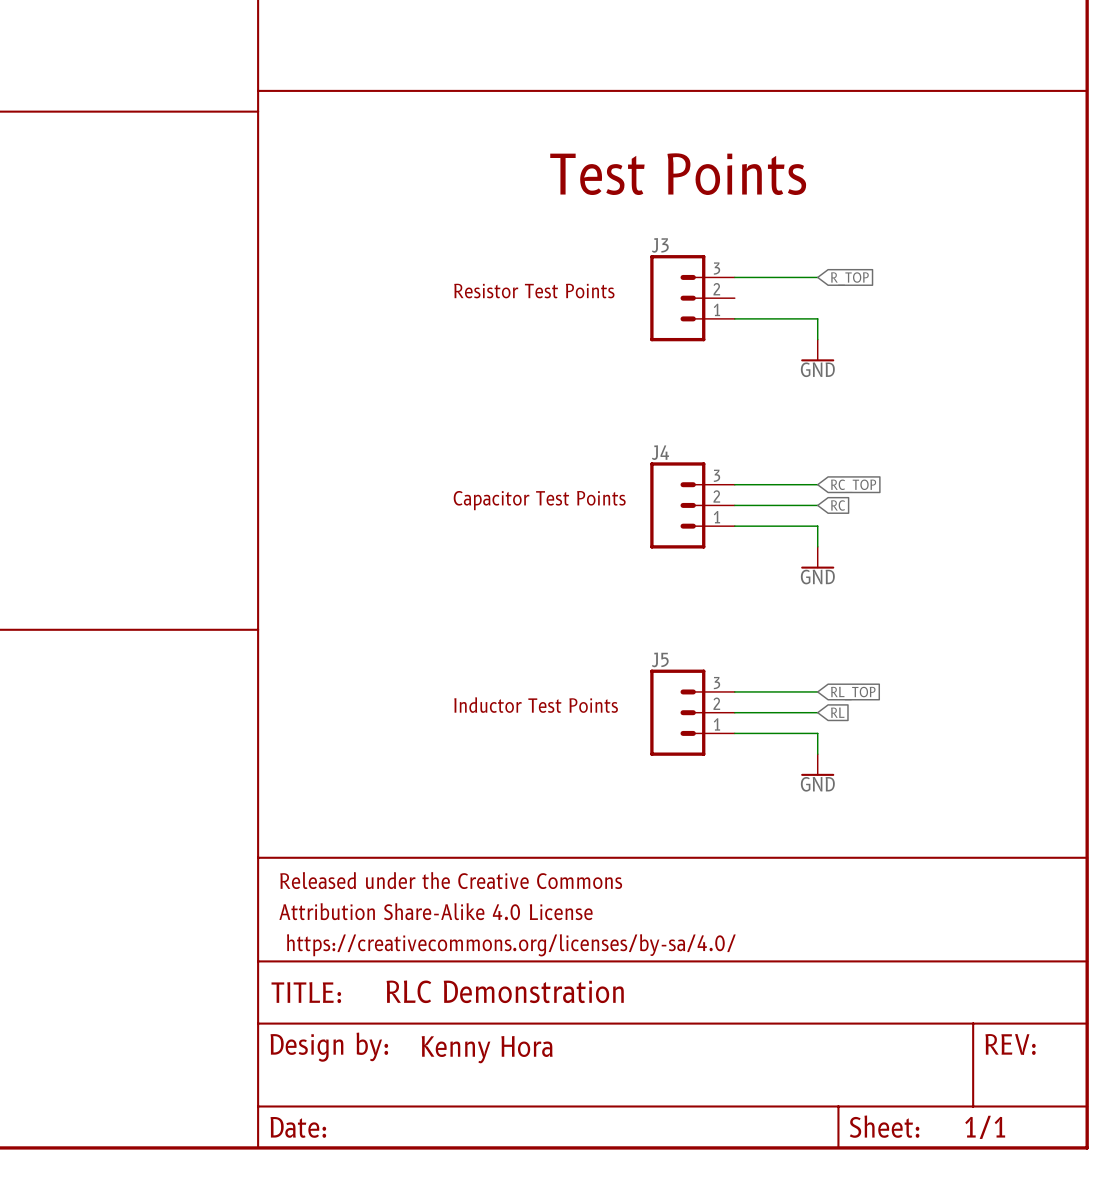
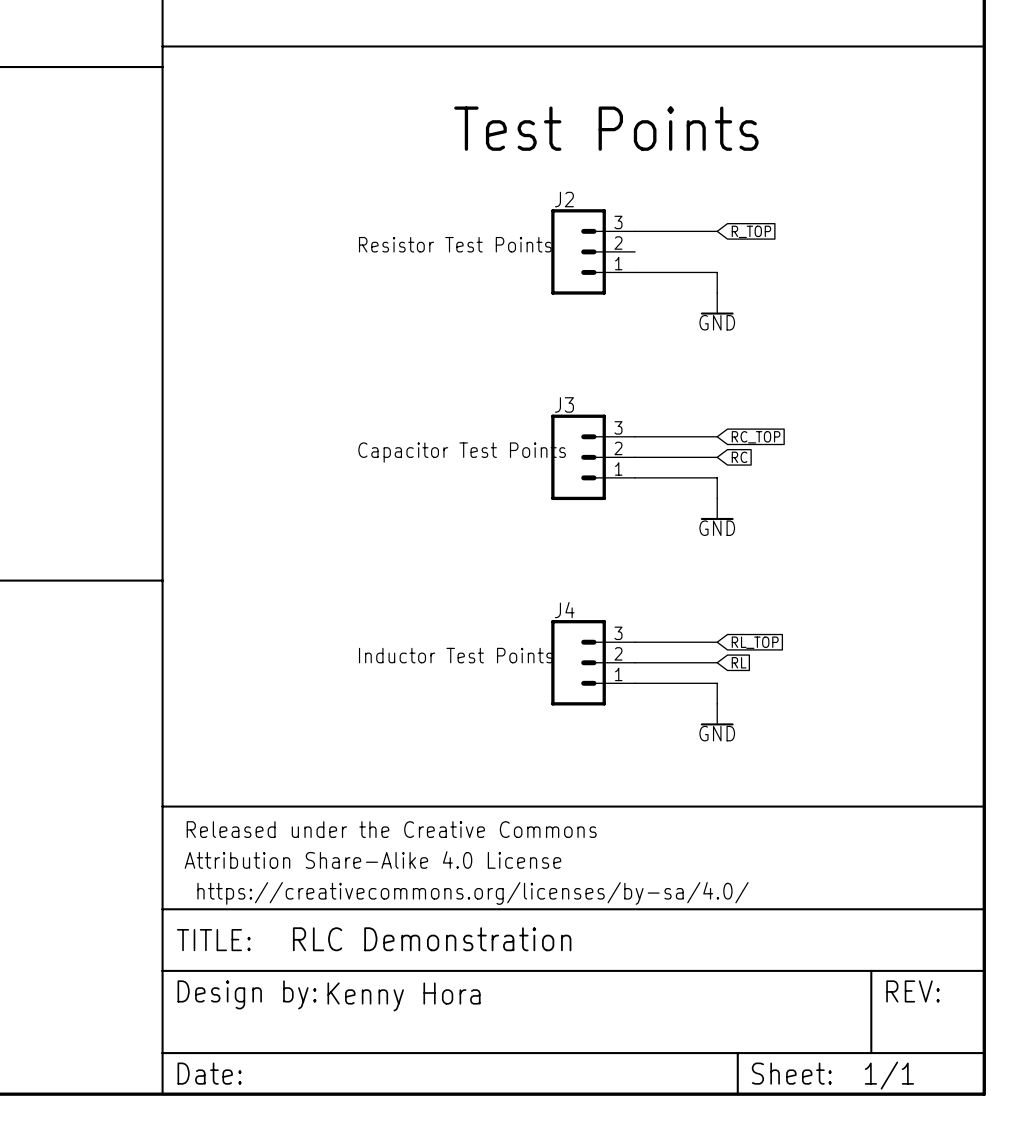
J3 name: J3 (660, 245) -> J2 (564, 199)
J4 name: J4 (660, 452) -> J3 (564, 404)
J5 name: J5 (660, 659) -> J4 (564, 610)

